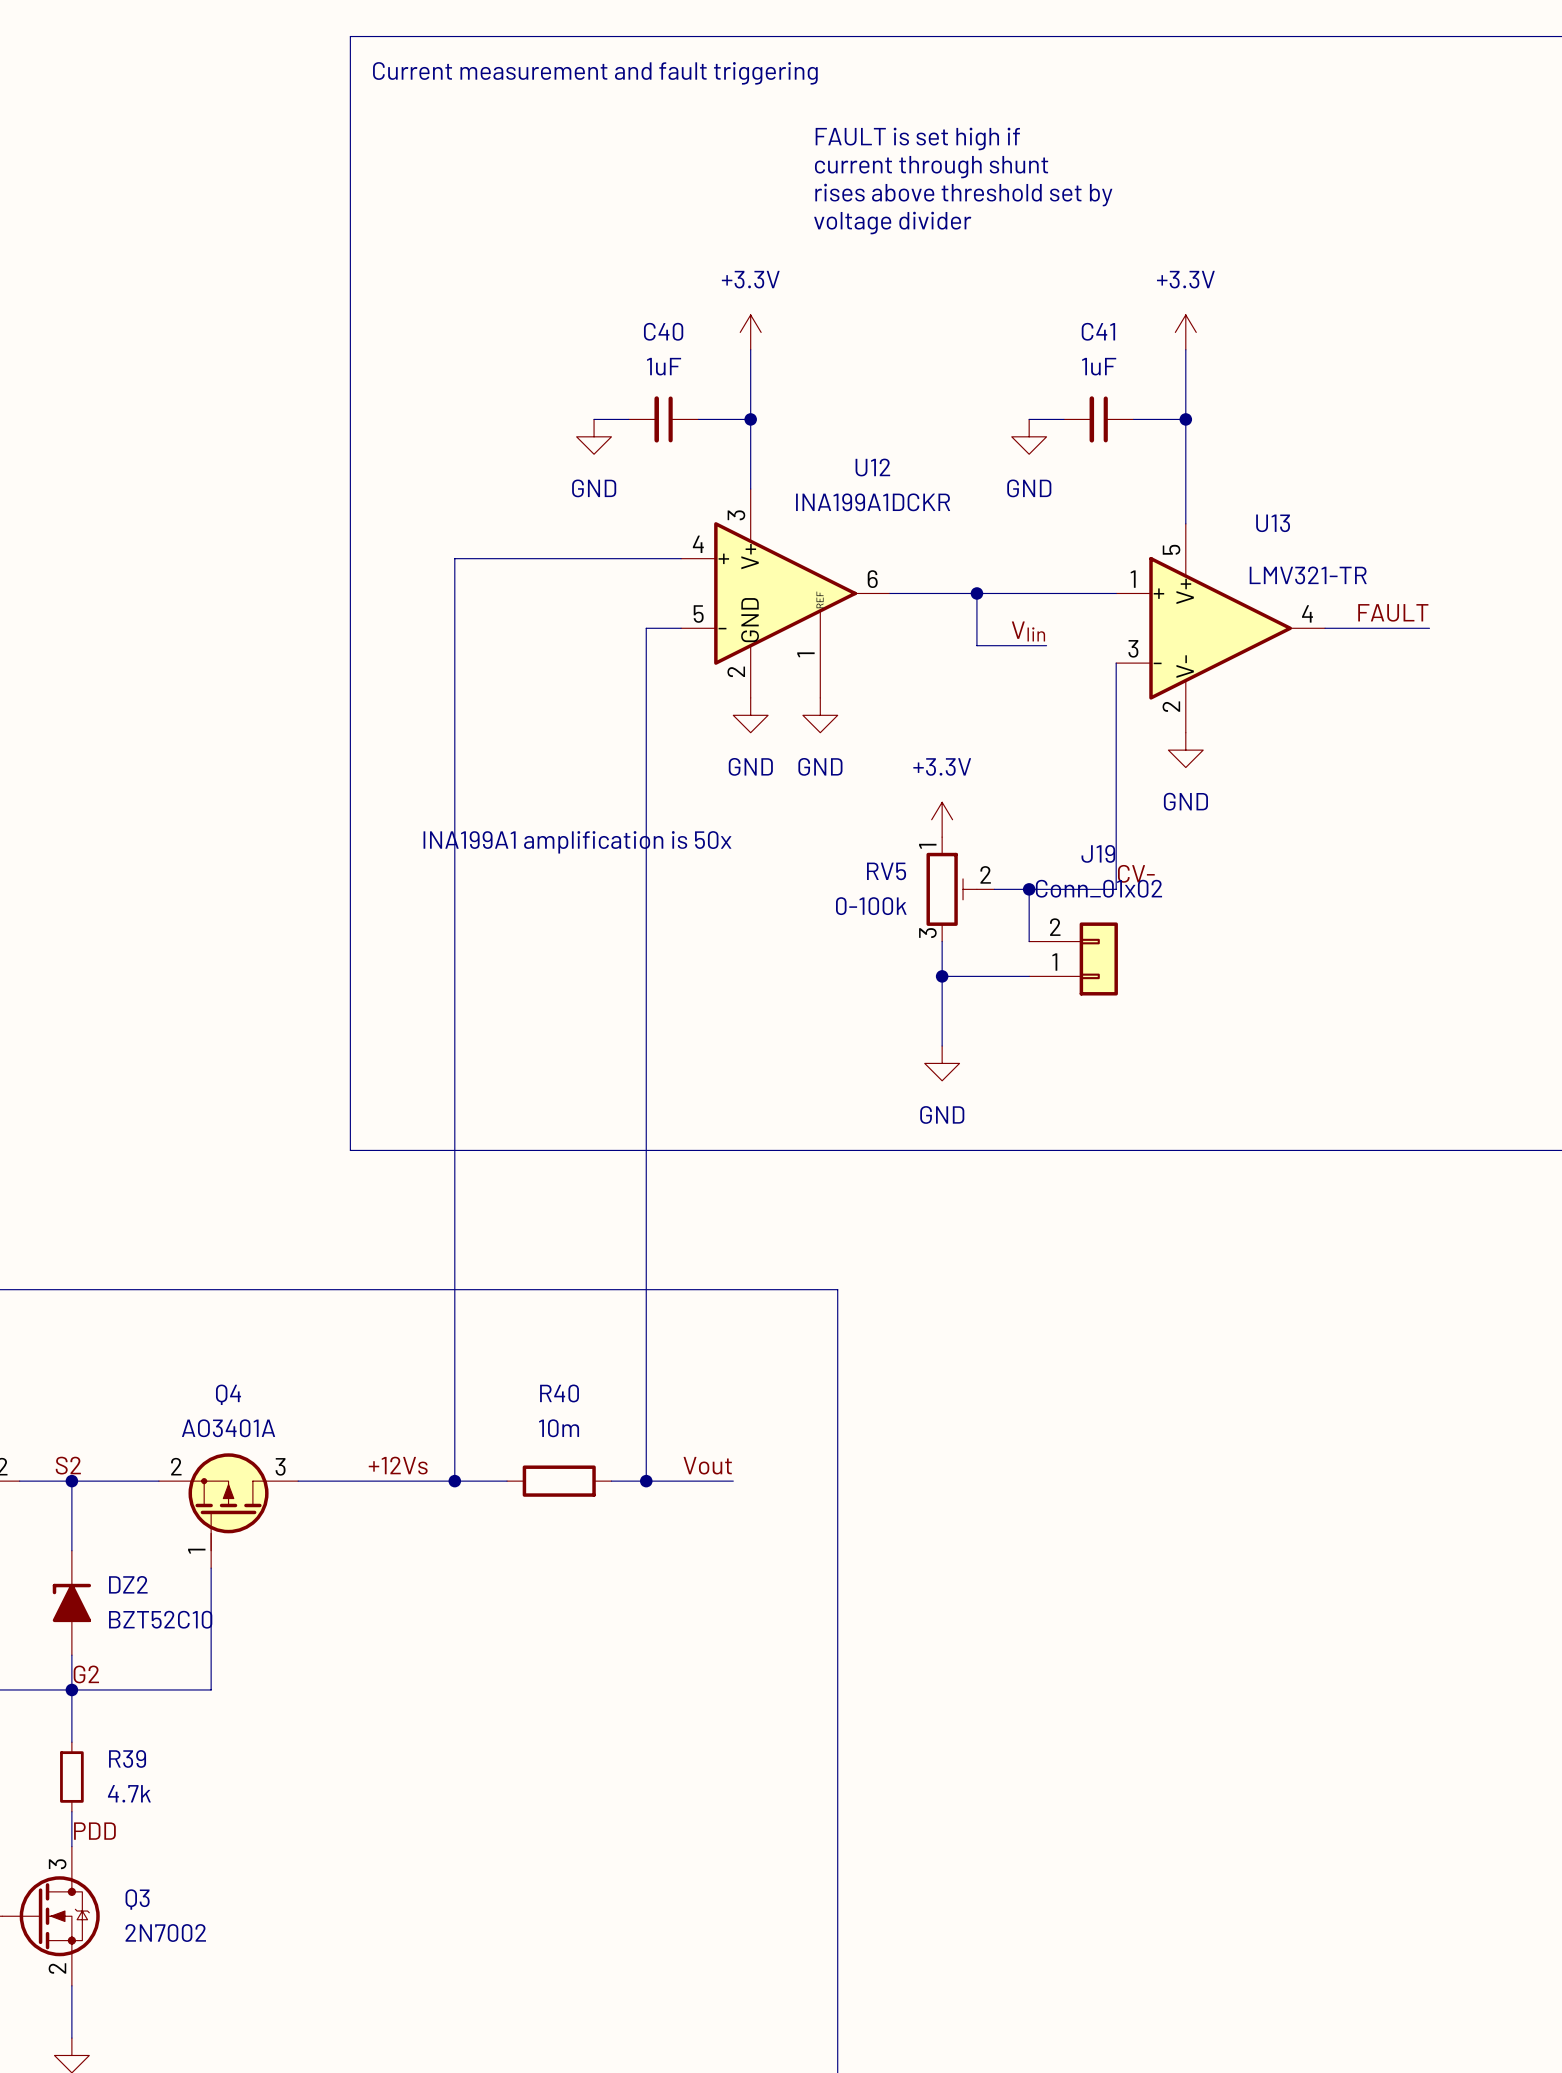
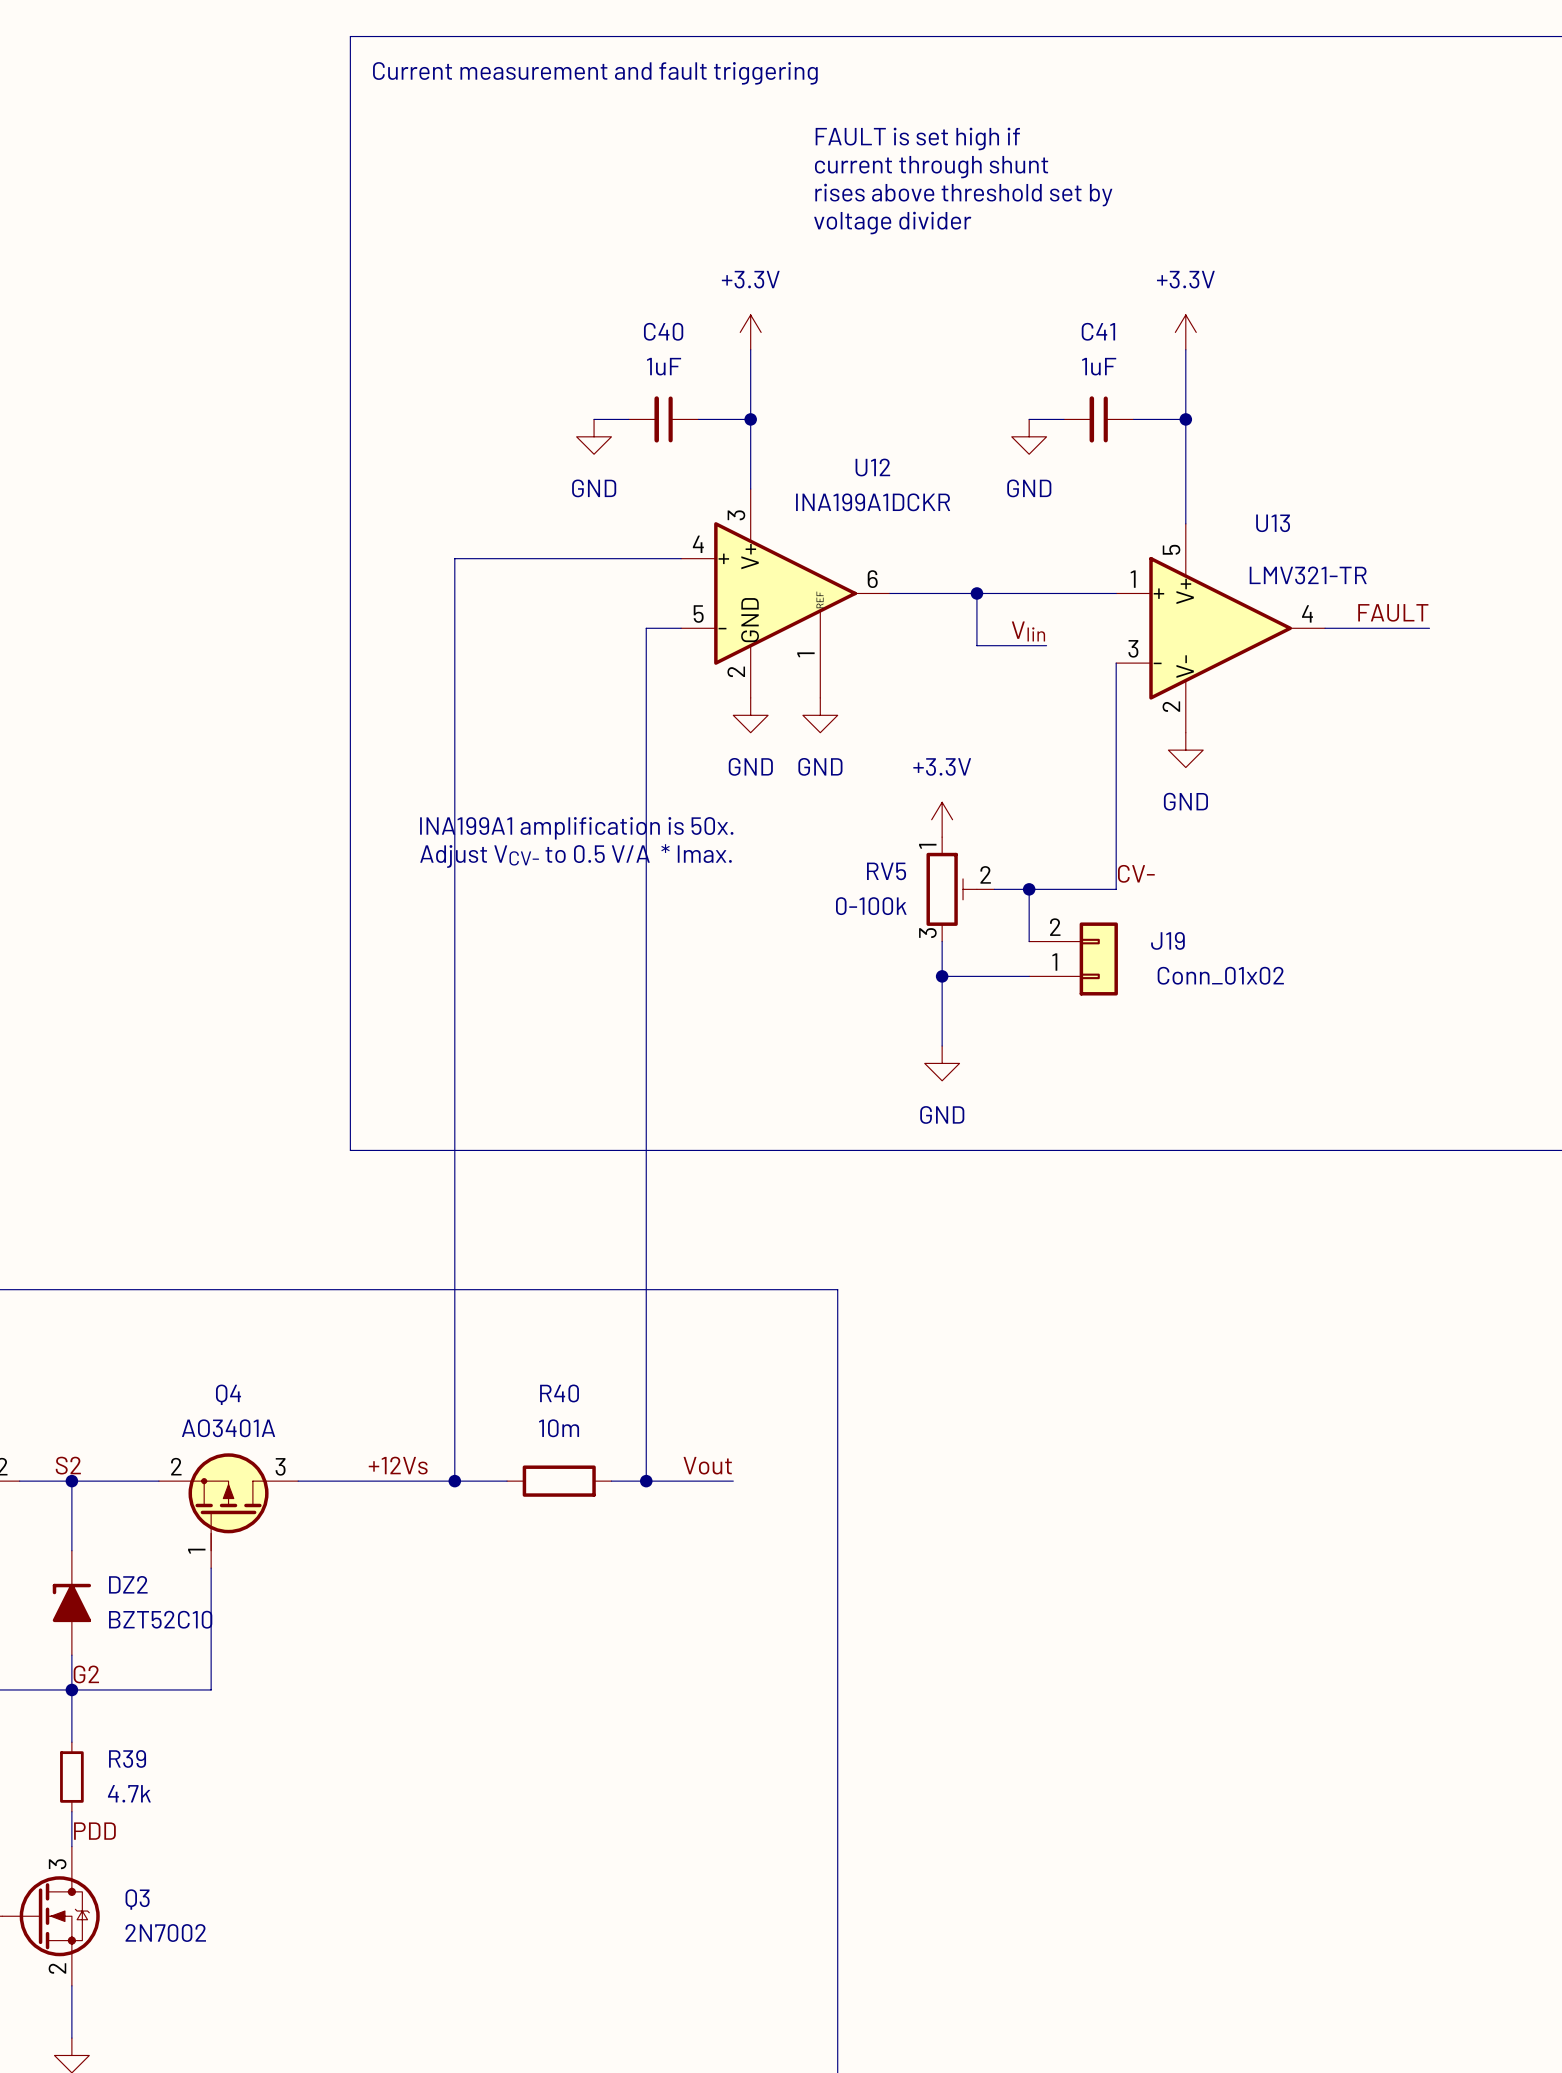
text: INA199A1 amplification is 50x (577, 842) -> INA199A1 amplification is 50x. (576, 828)
J19 name position: J19 (1098, 853) -> J19 (1167, 940)
text: none -> Adjust VCV- to 0.5 V/A * Imax. (575, 856)
J19 value position: Conn_01x02 (1098, 888) -> Conn_01x02 (1220, 975)

